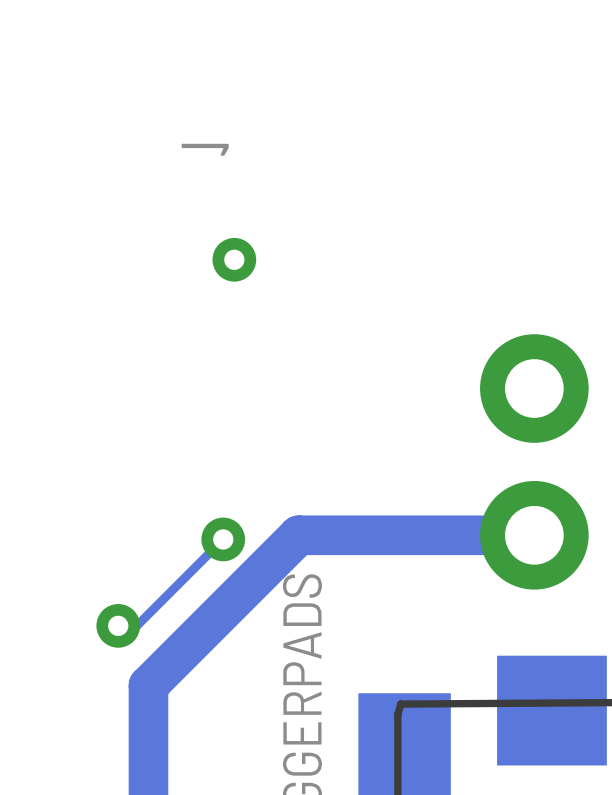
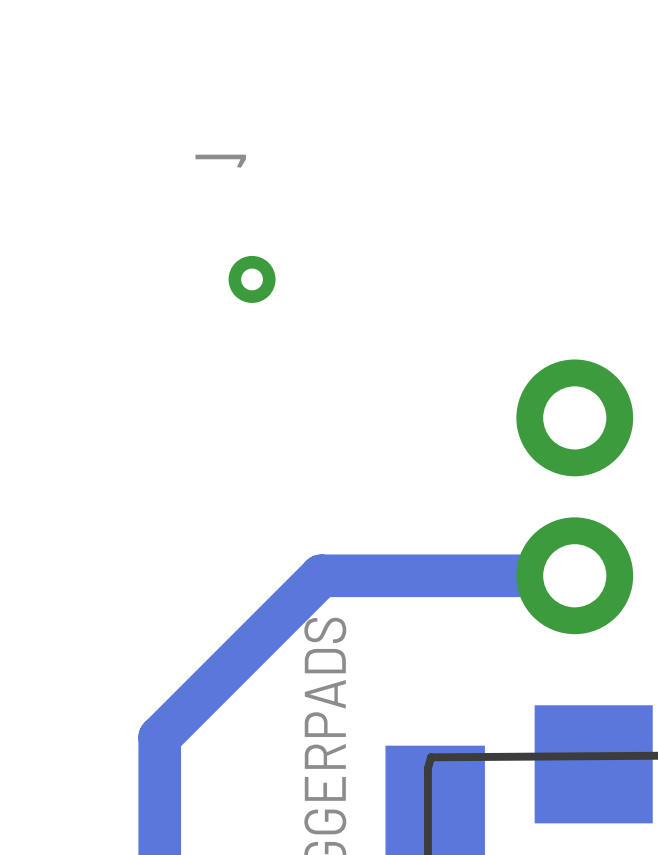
track: (223, 539) (136, 625) (118, 625) -> none
via: (223, 539) -> none
via: (118, 625) -> none

